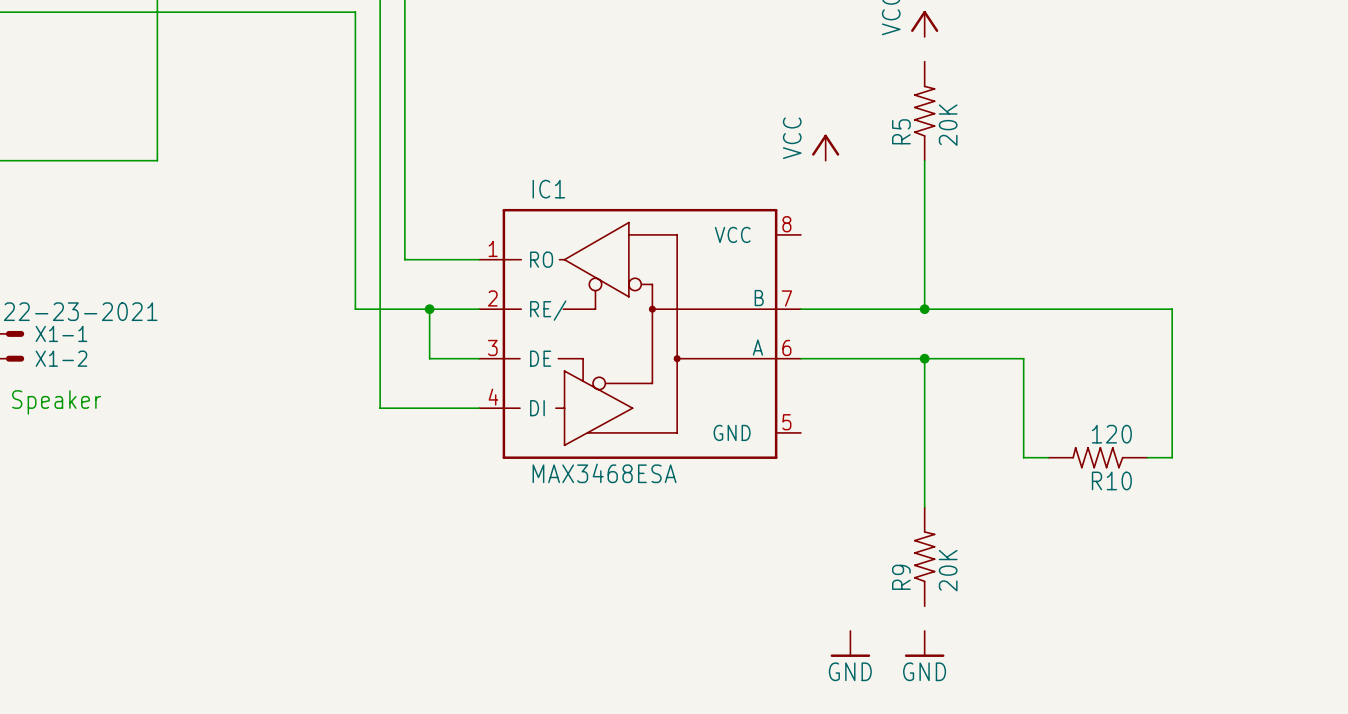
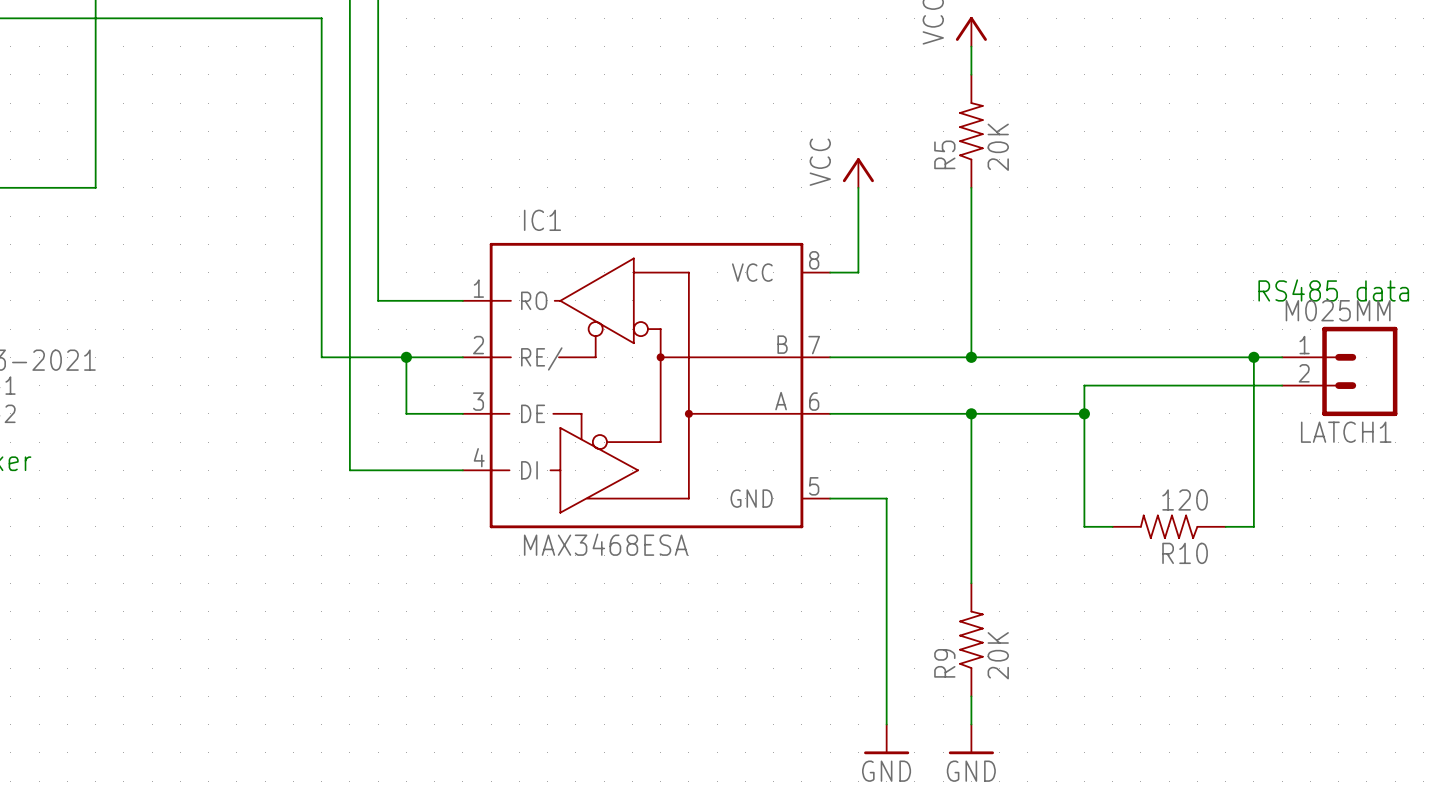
wire: none -> (971, 46) (971, 74)
wire: none -> (858, 187) (858, 272) (830, 272)
text: none -> RS485 data (1333, 290)
wire: none -> (1253, 357) (1282, 357)
junction: none -> (1253, 357)
LATCH1: none -> M025MM (1339, 371)
wire: none -> (1282, 385) (1084, 385) (1084, 413)
junction: none -> (1084, 413)
wire: none -> (830, 498) (886, 498) (886, 724)
wire: none -> (971, 696) (971, 724)

